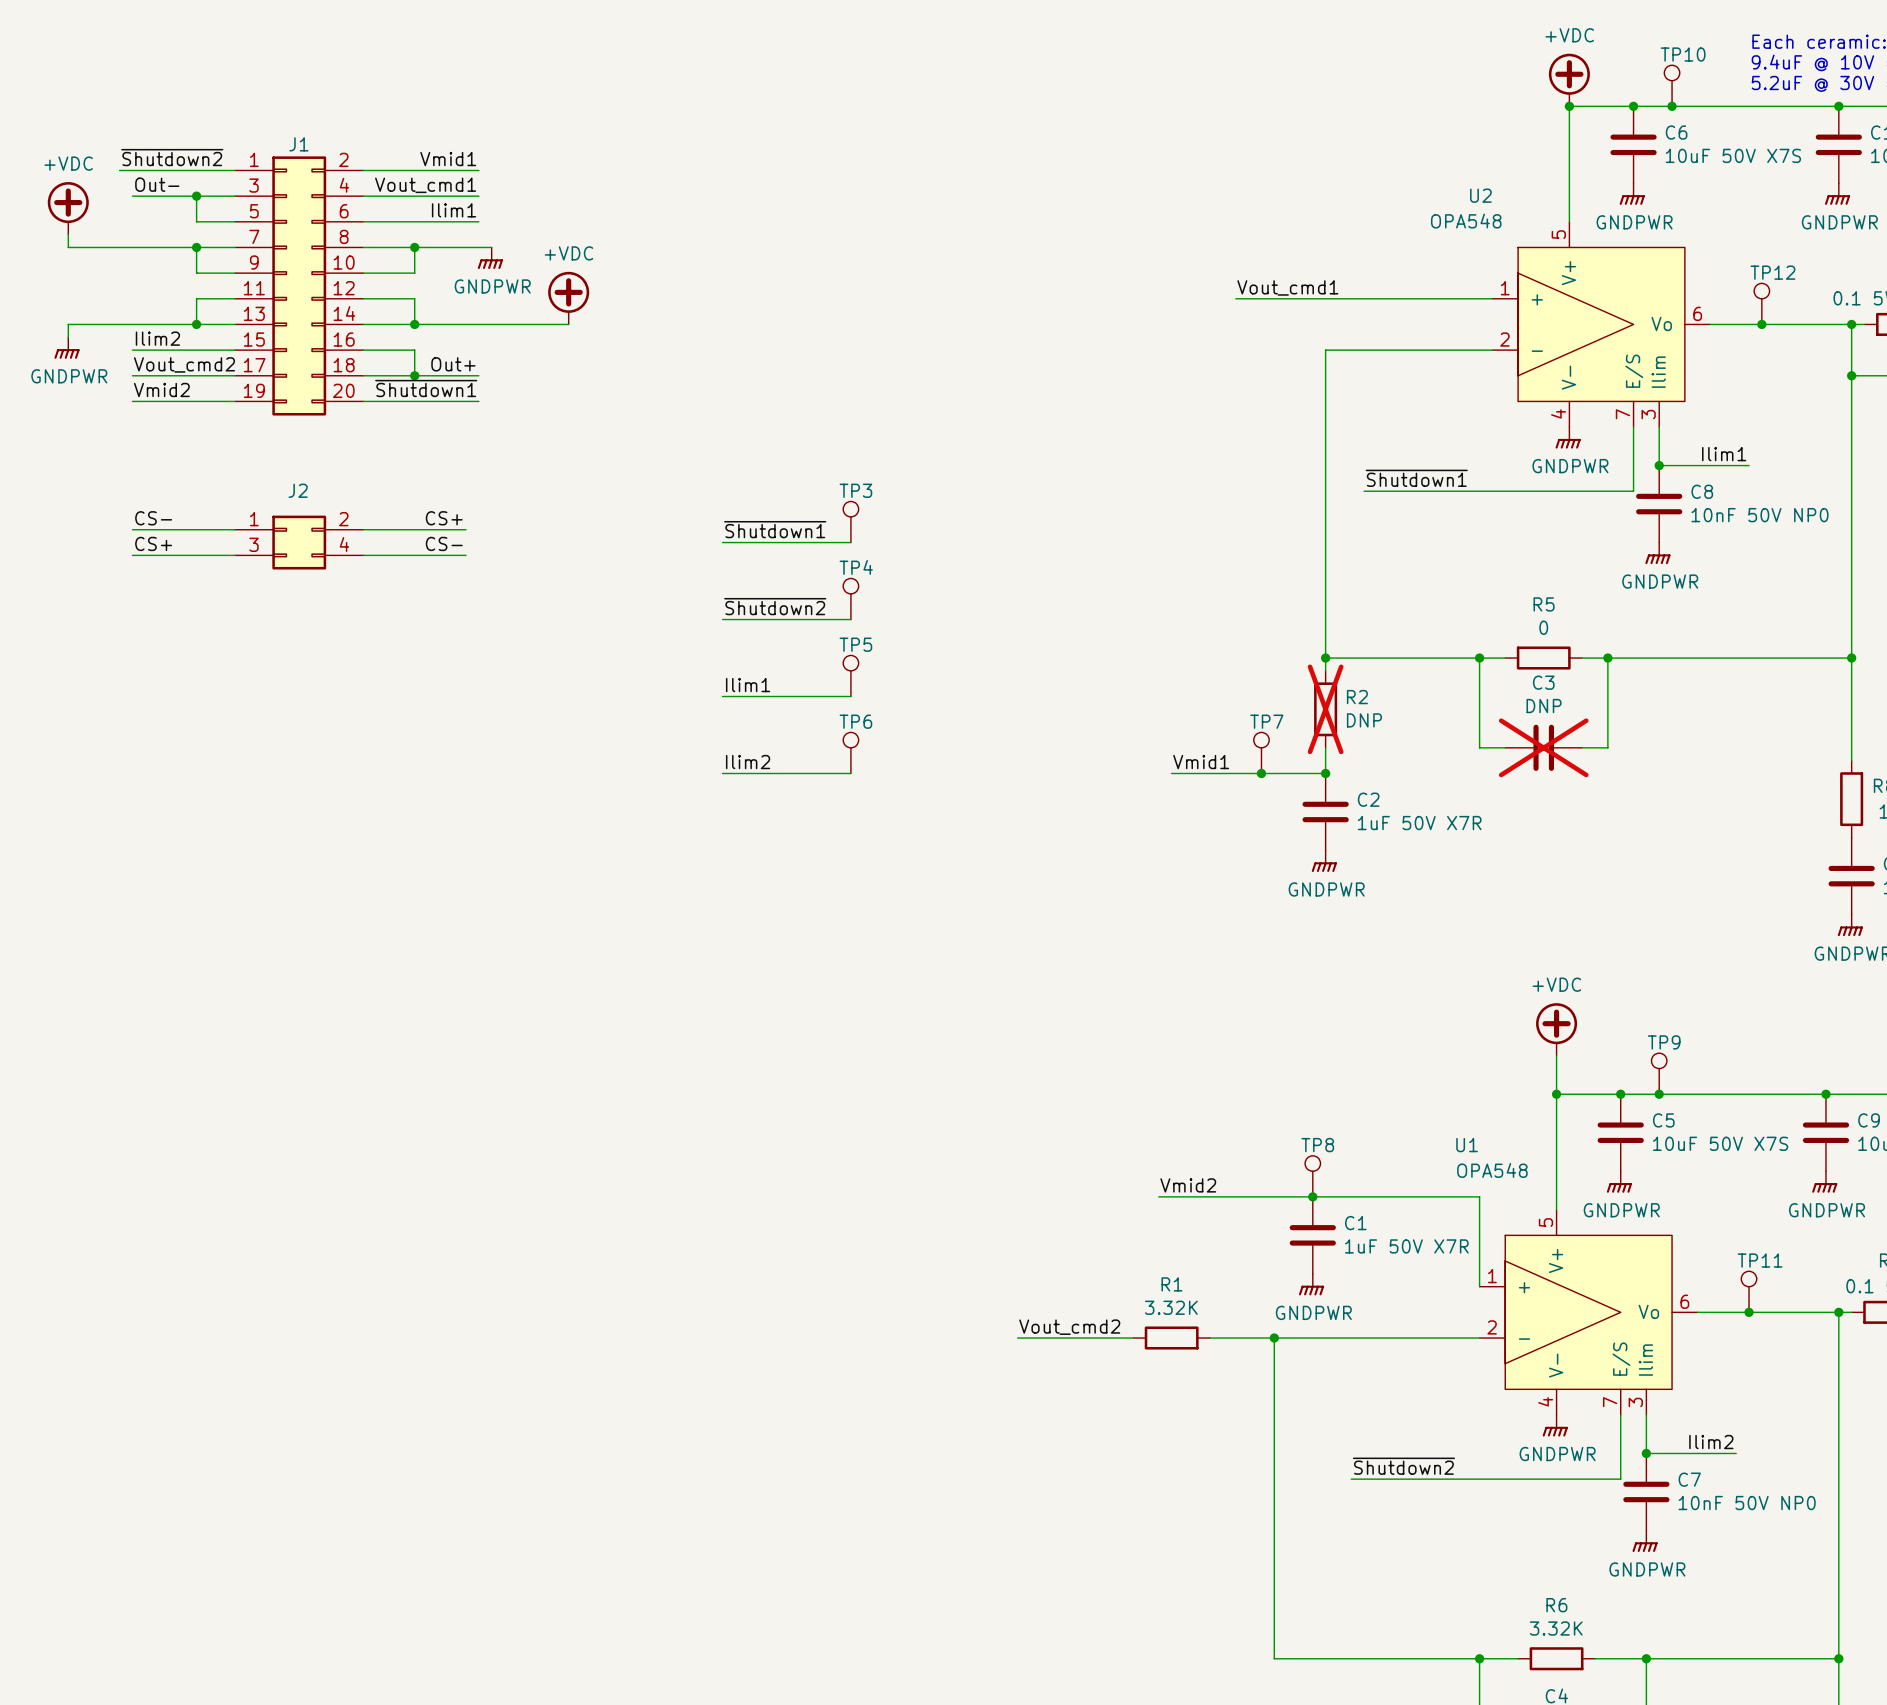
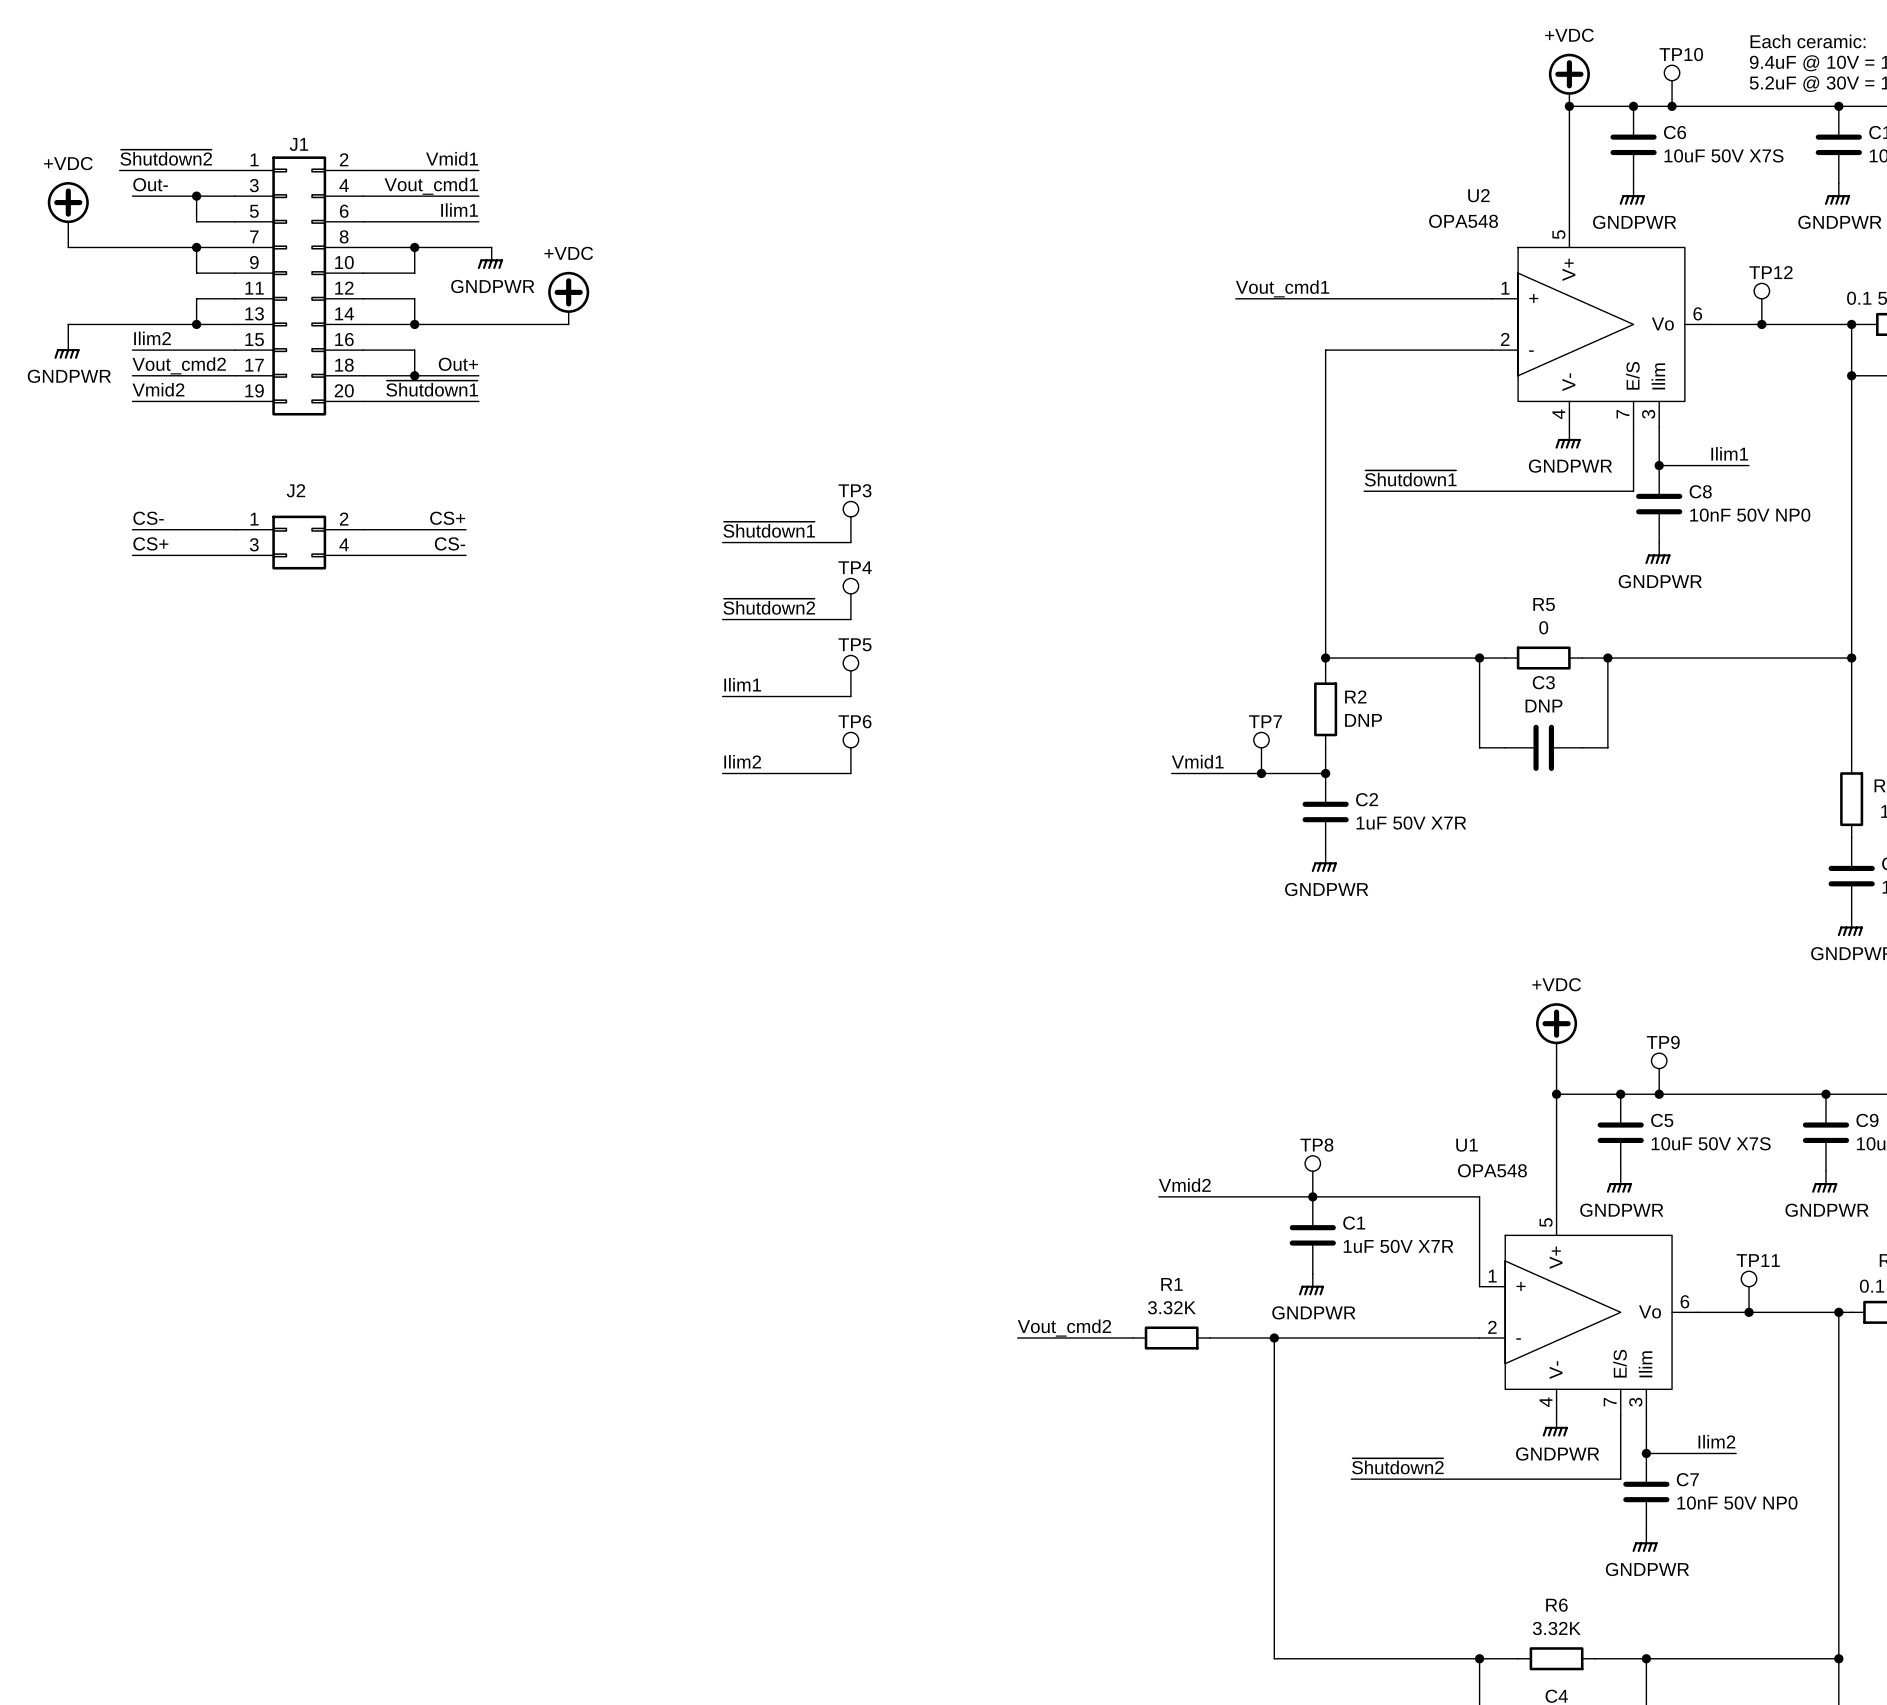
R2 do-not-place cross: (1325, 709) -> none
C3 do-not-place cross: (1543, 747) -> none

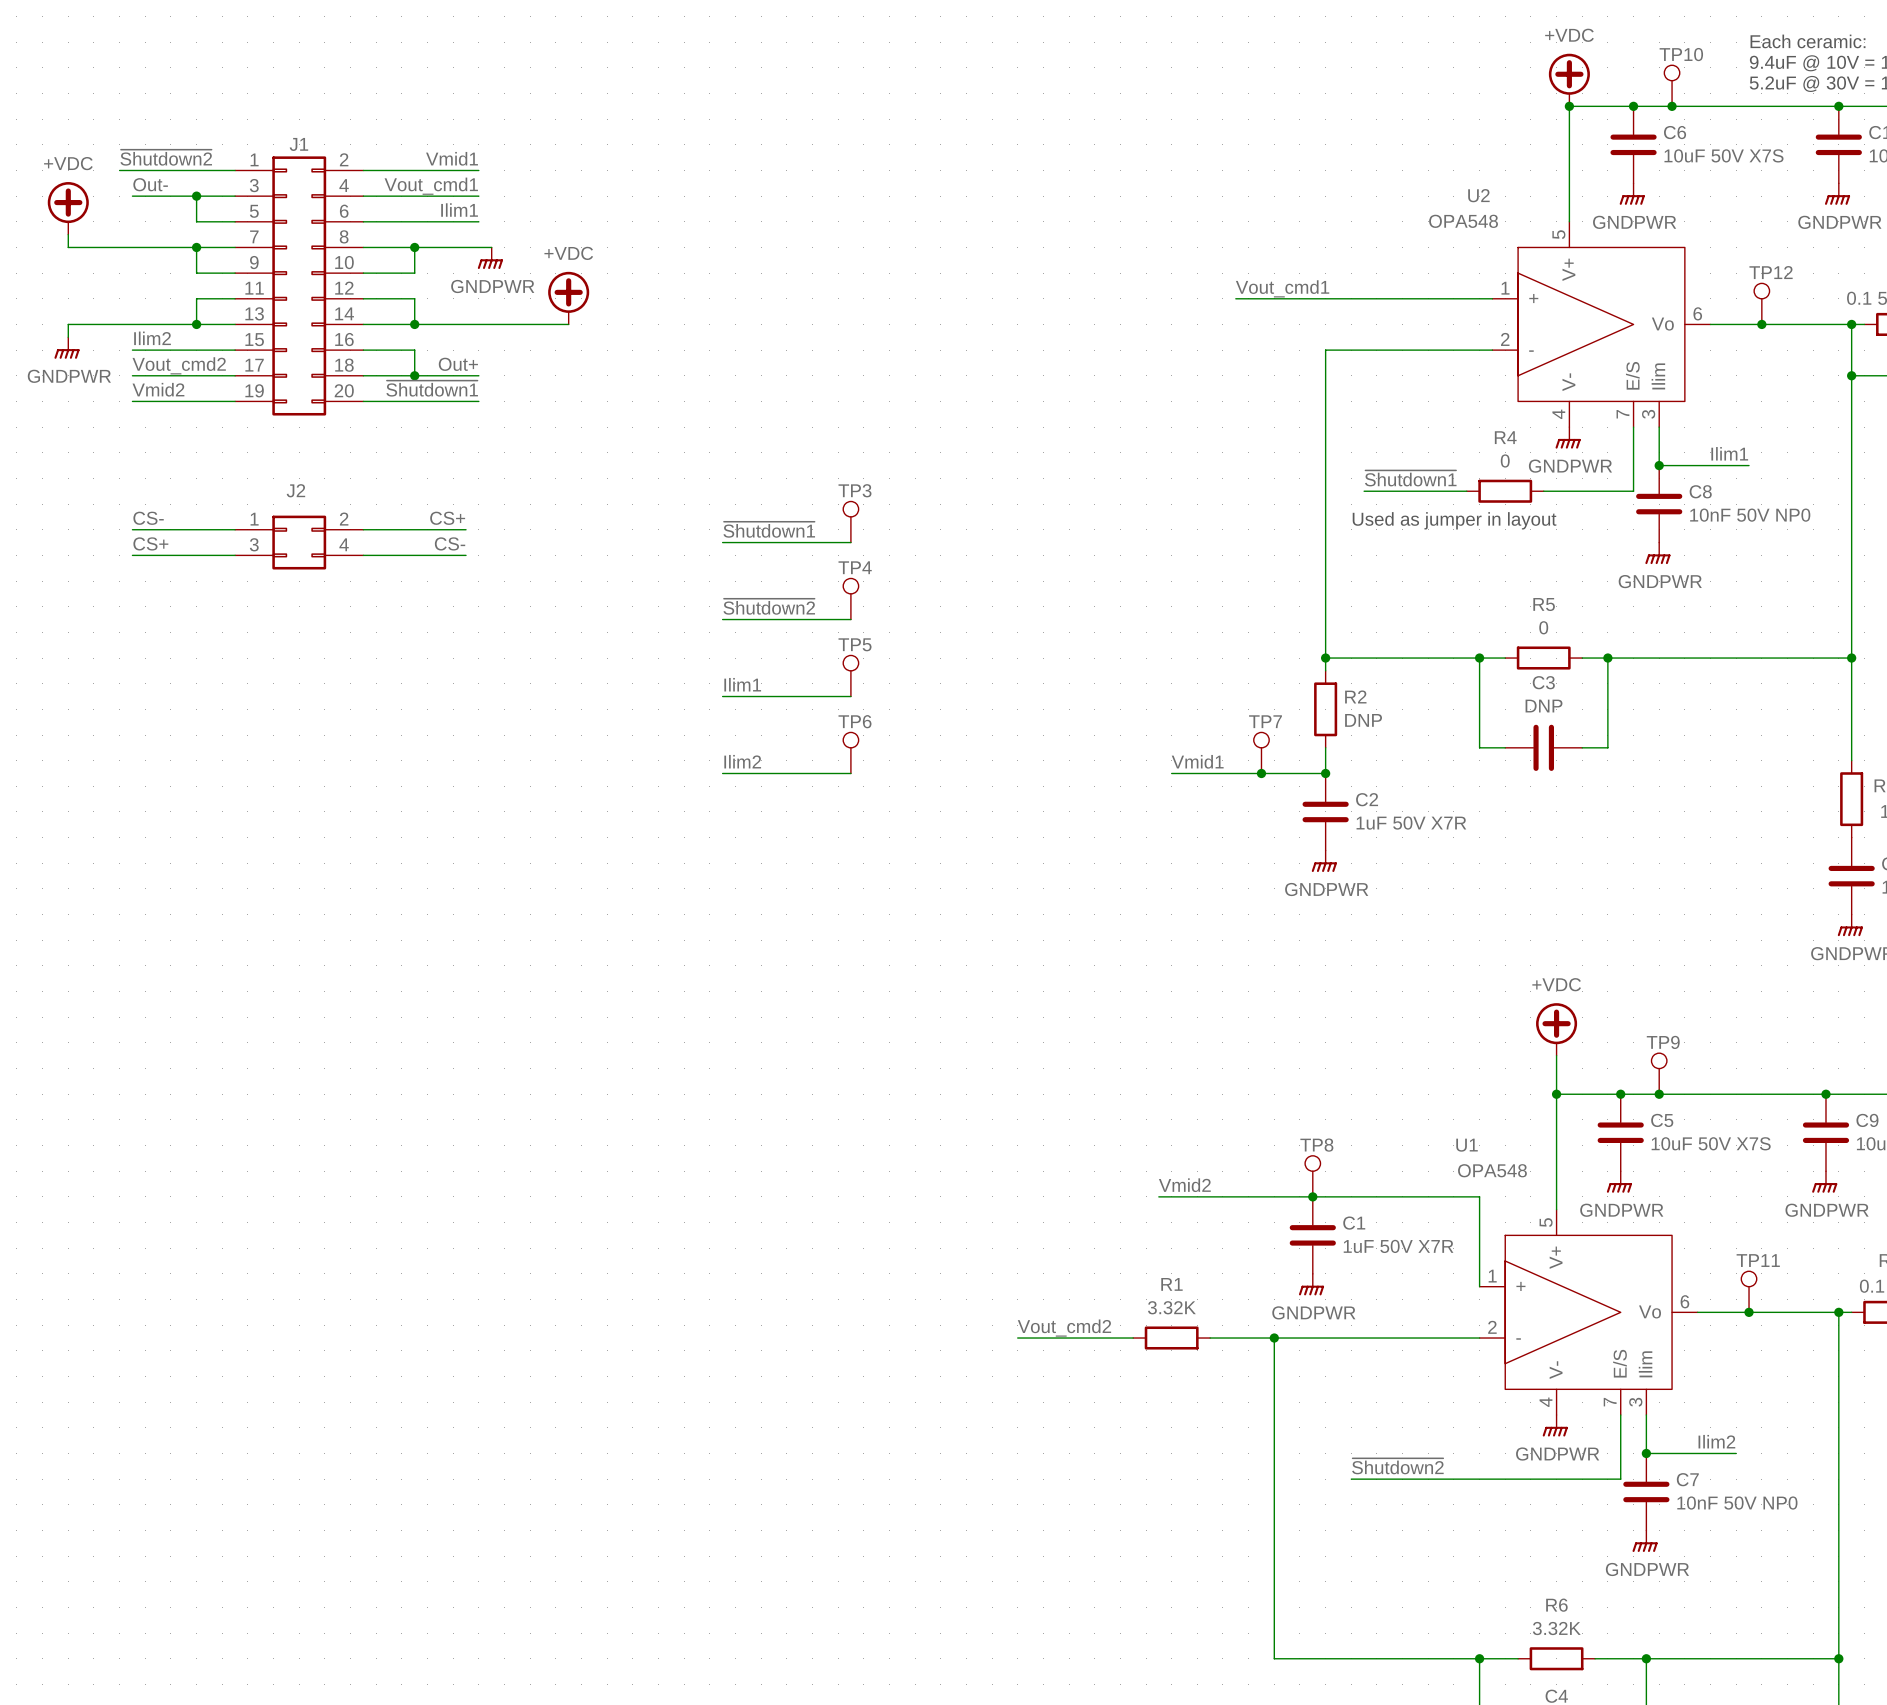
wire: (1466, 491) (1543, 491) -> none
R4: none -> 0 (1505, 491)
text: none -> Used as jumper in layout (1454, 520)

